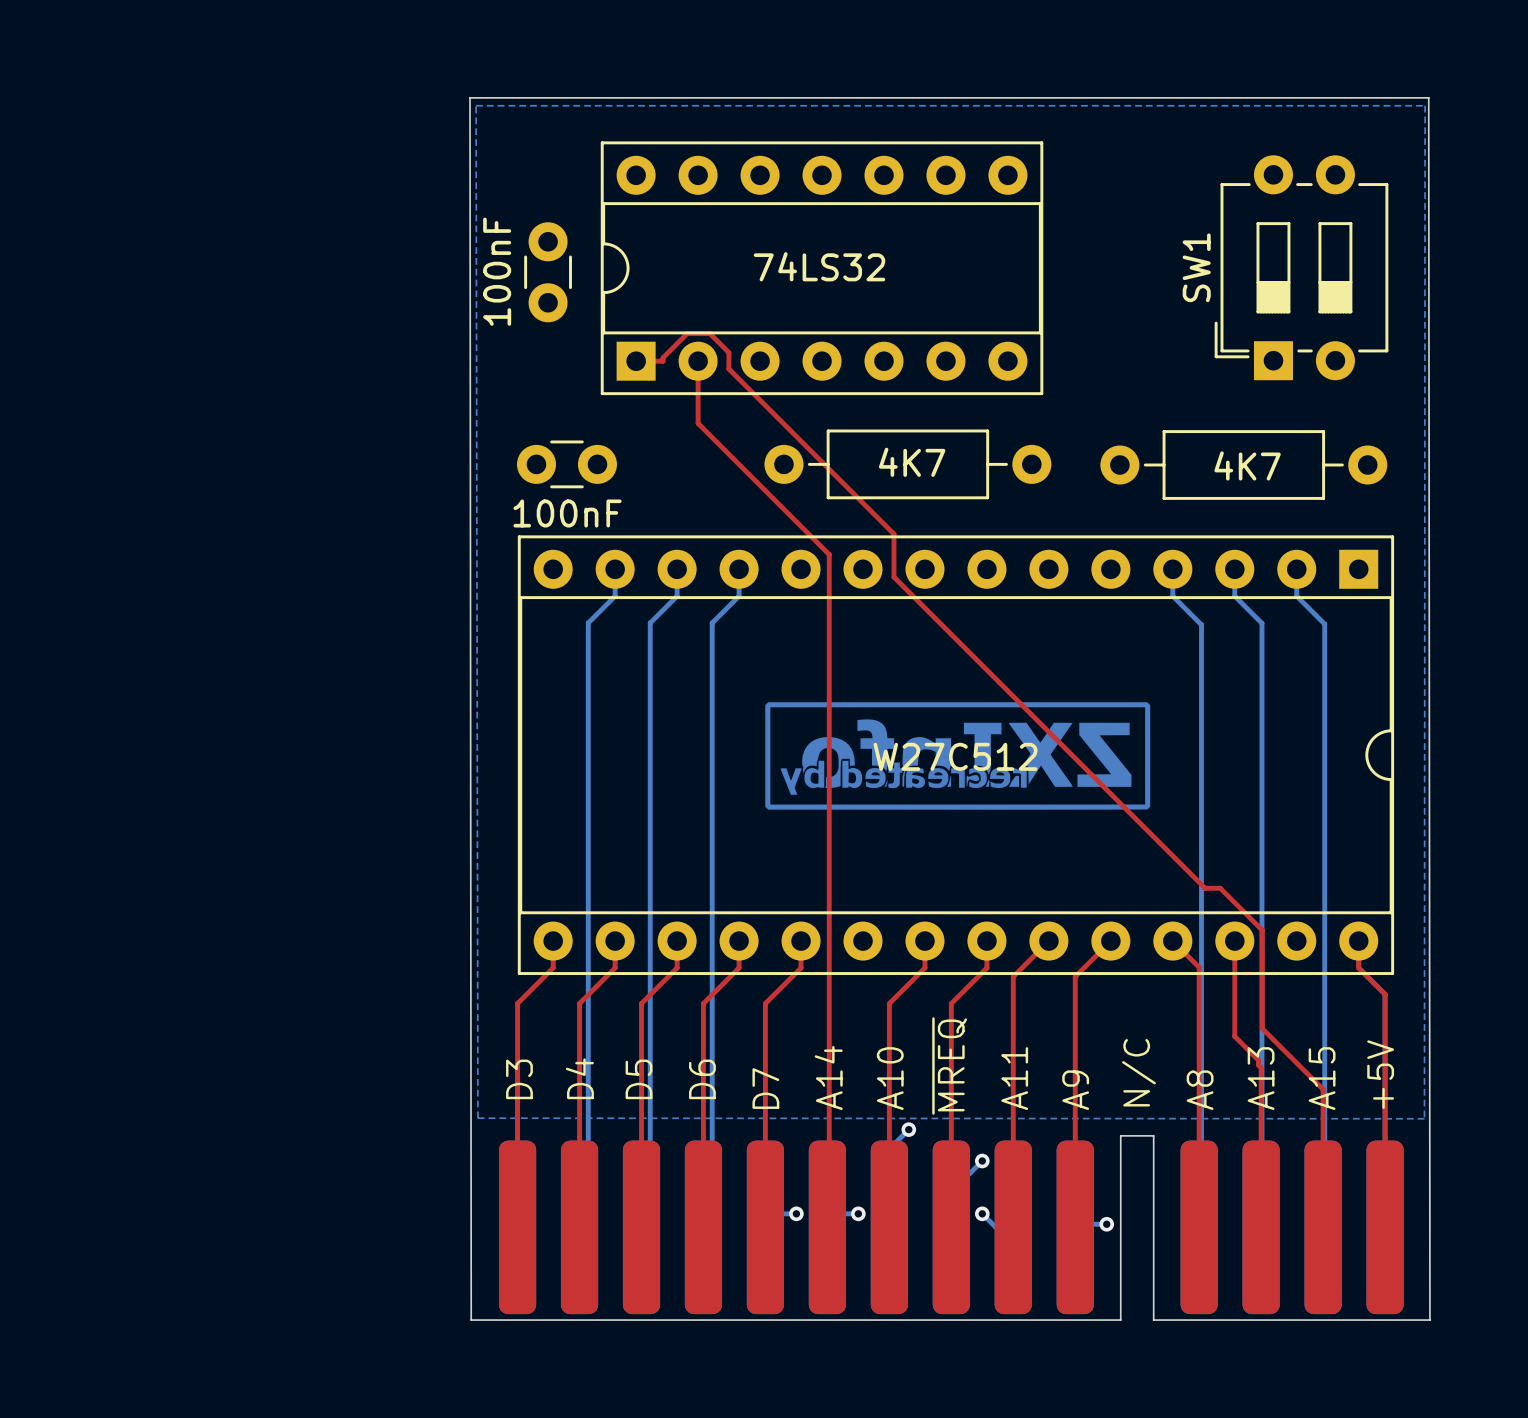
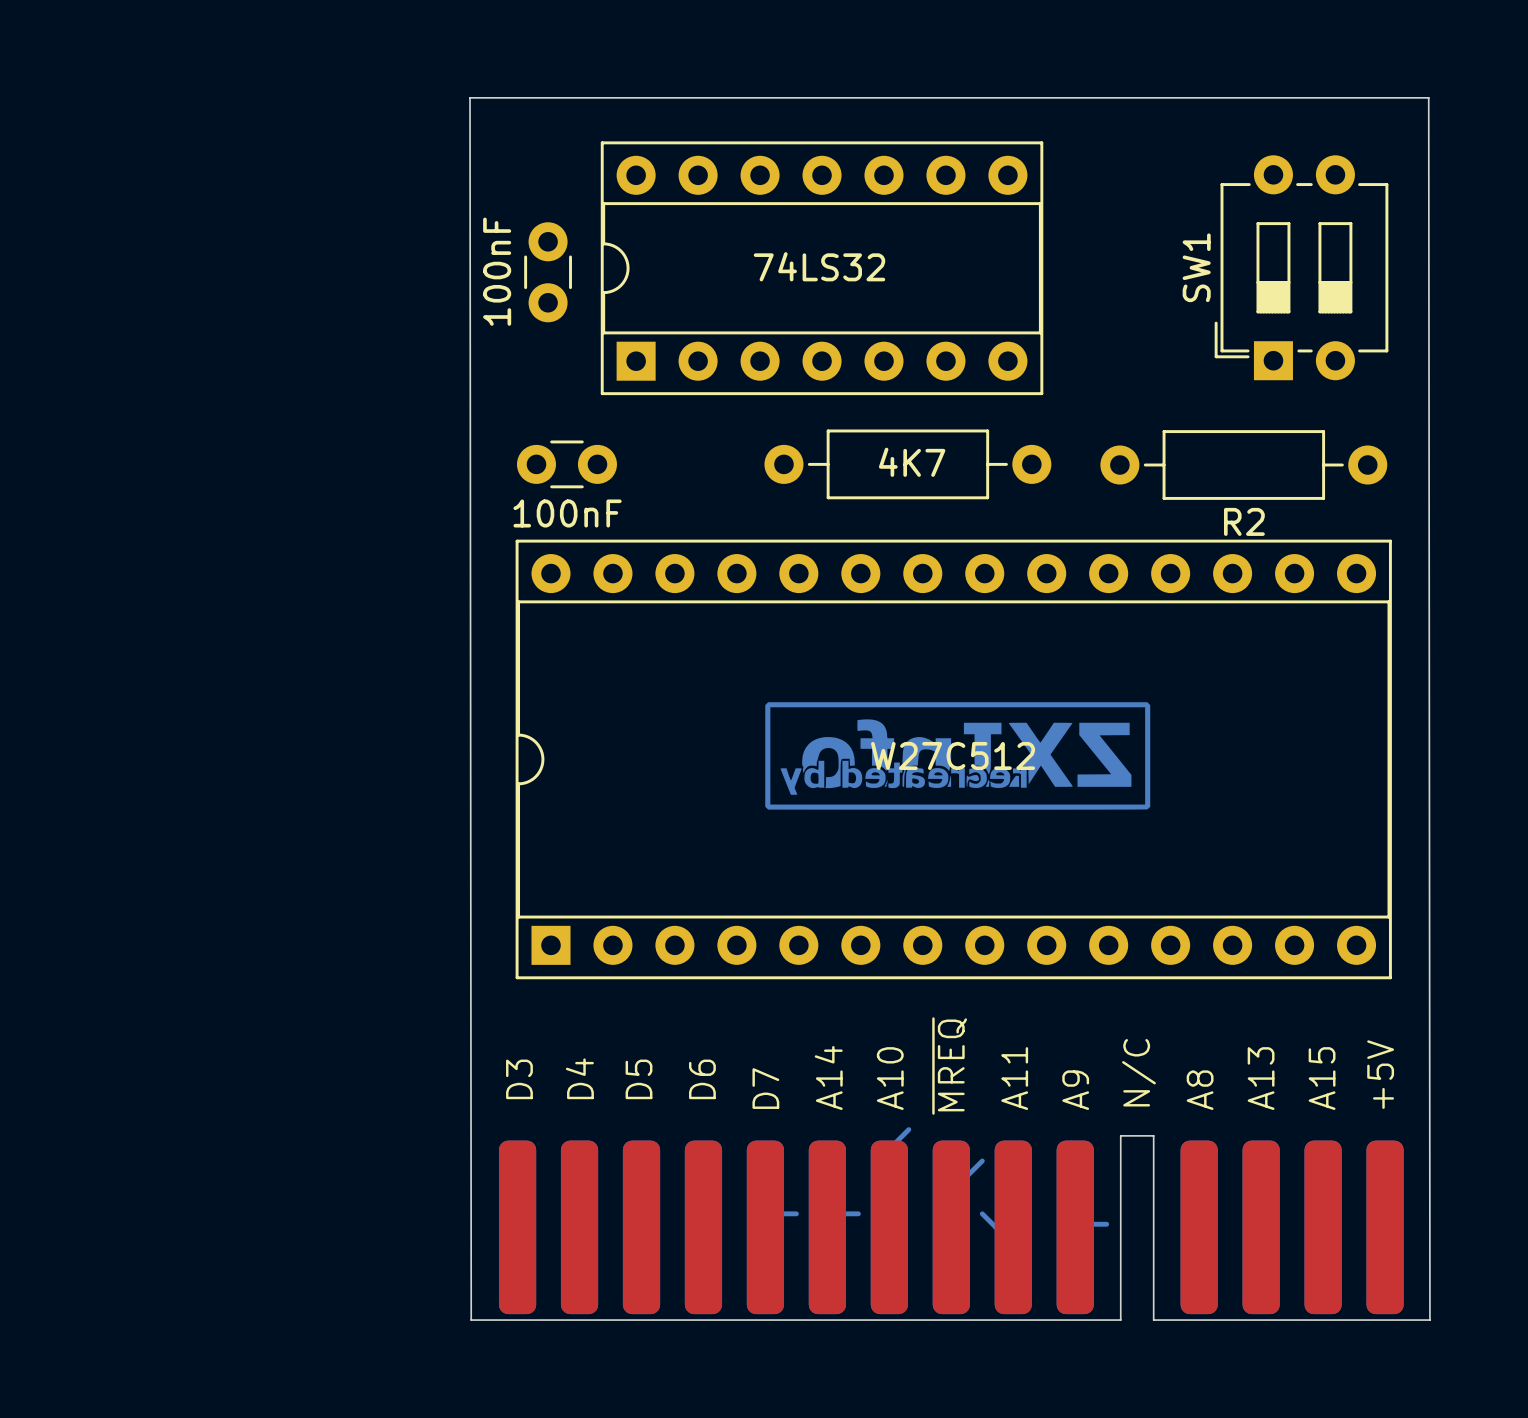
bottom zone outline: (476, 105) (1425, 105) (1424, 1118) (477, 1118) (476, 105) -> none
top track: (636, 361) (663, 361) (663, 357) (687, 333) (709, 333) (728, 352) (728, 369) (893, 534) (893, 577) (1205, 888) (1220, 888) (1262, 930) (1262, 1028) (1323, 1089) (1323, 1227) -> none
top track: (698, 361) (698, 423) (829, 554) (829, 1225) (827, 1227) -> none
R2 value: 4K7 (1247, 465) -> none
R2 name: none -> R2 (1244, 521)
bottom track: (615, 569) (615, 596) (588, 623) (588, 1218) (579, 1227) -> none
bottom track: (677, 569) (677, 596) (650, 623) (650, 1218) (641, 1227) -> none
bottom track: (739, 569) (739, 596) (712, 623) (712, 1218) (703, 1227) -> none
bottom track: (1172, 569) (1172, 596) (1201, 624) (1201, 1225) (1199, 1227) -> none
bottom track: (1234, 569) (1234, 596) (1261, 623) (1261, 1227) -> none
bottom track: (1296, 569) (1296, 596) (1324, 624) (1324, 1225) (1323, 1227) -> none
part rotation: 0° (955, 755) -> 180° (953, 759)
top track: (553, 941) (553, 967) (517, 1003) (517, 1227) -> none
top track: (615, 941) (615, 967) (579, 1003) (579, 1227) -> none
top track: (677, 941) (677, 967) (641, 1003) (641, 1227) -> none
top track: (739, 941) (739, 967) (703, 1003) (703, 1227) -> none
top track: (801, 941) (801, 967) (765, 1003) (765, 1227) -> none
top track: (924, 941) (924, 967) (889, 1003) (889, 1227) -> none
top track: (986, 941) (986, 967) (951, 1003) (951, 1227) -> none
top track: (1048, 941) (1013, 976) (1013, 1227) -> none
top track: (1110, 941) (1075, 976) (1075, 1227) -> none
top track: (1172, 941) (1199, 967) (1199, 1227) -> none
top track: (1234, 941) (1234, 1036) (1258, 1060) (1258, 1065) (1261, 1067) (1261, 1227) -> none
top track: (1358, 941) (1358, 967) (1385, 994) (1385, 1227) -> none
via: (908, 1129) -> none
via: (982, 1160) -> none
via: (796, 1213) -> none
via: (858, 1213) -> none
via: (982, 1213) -> none
via: (1106, 1224) -> none

